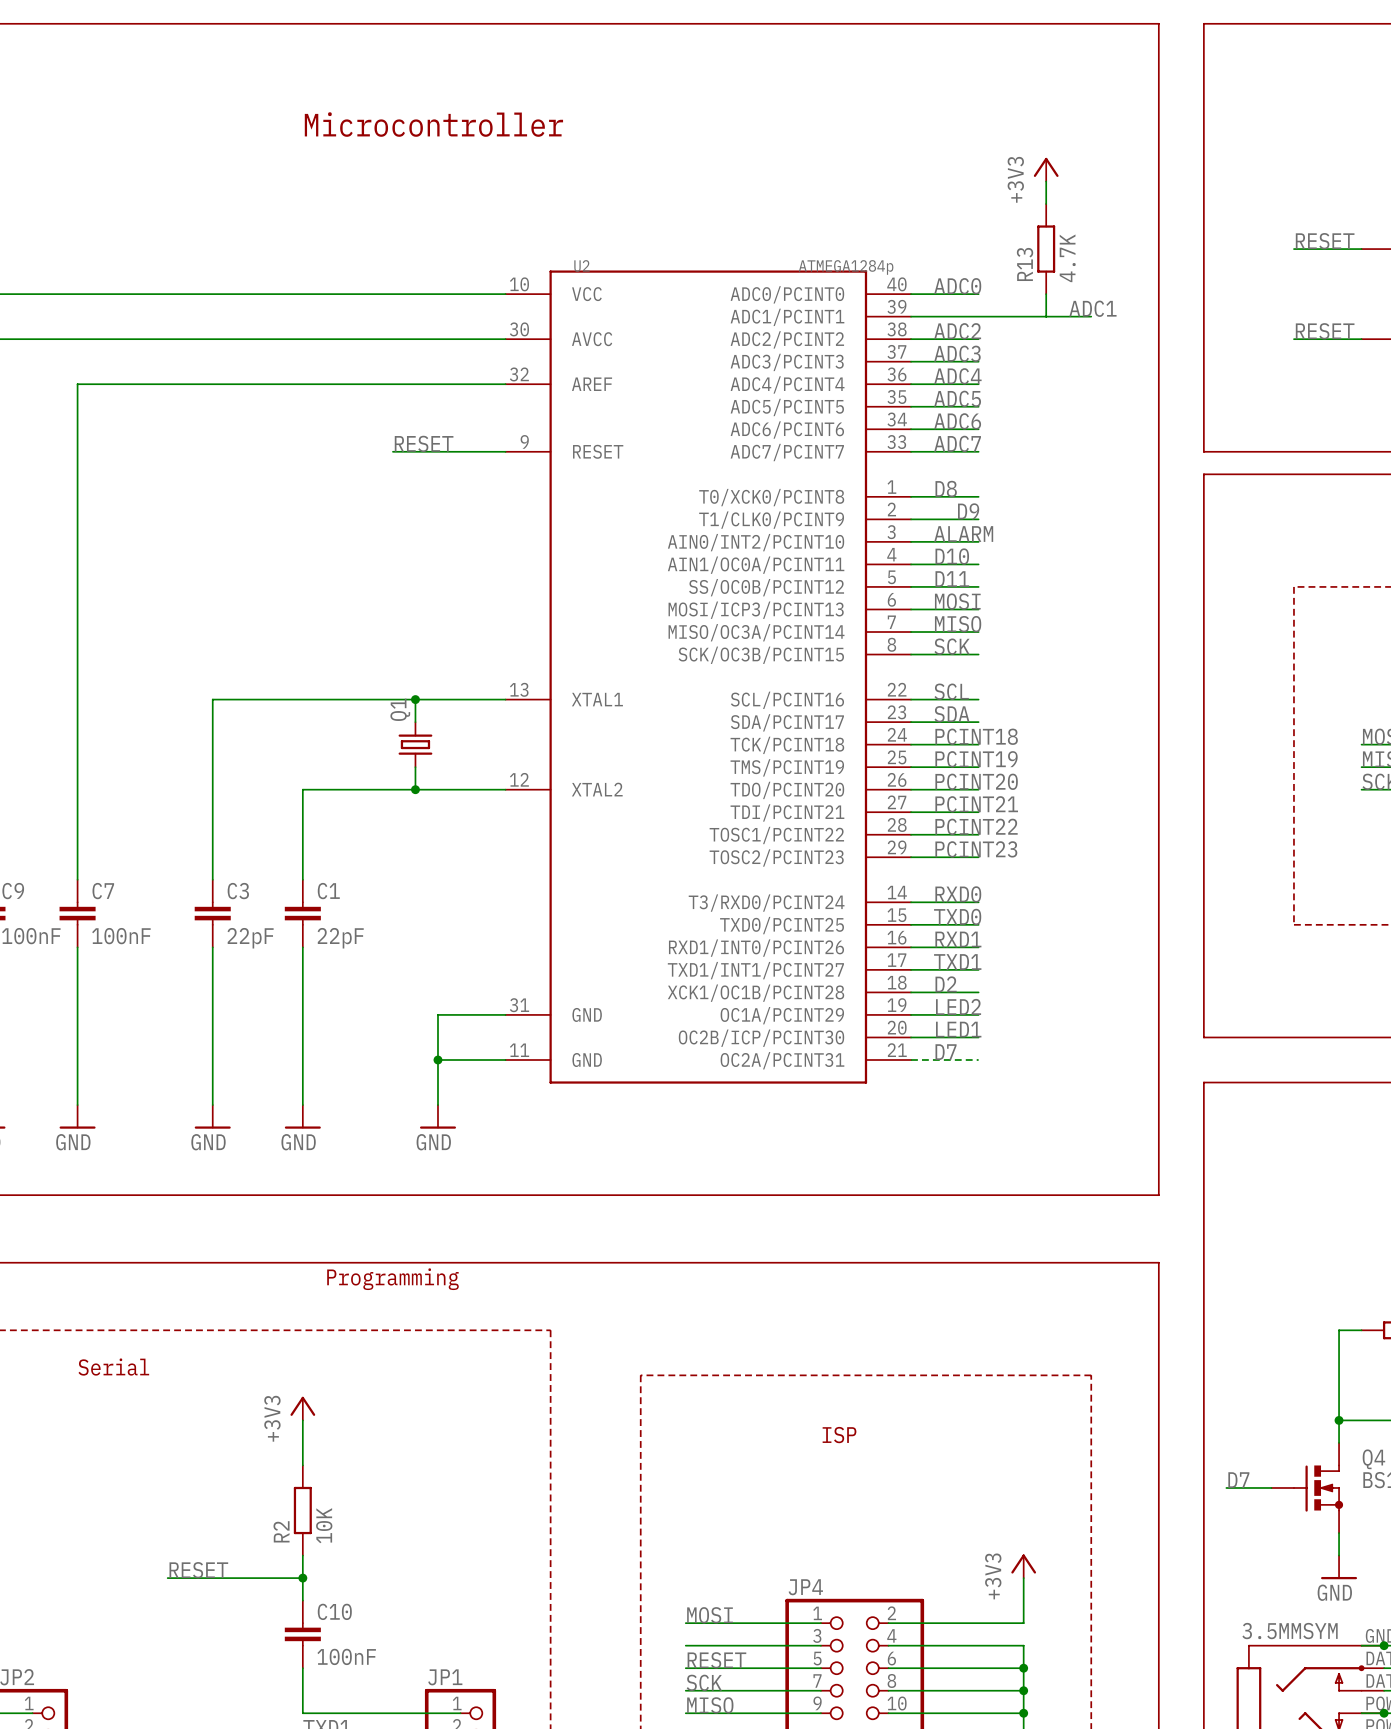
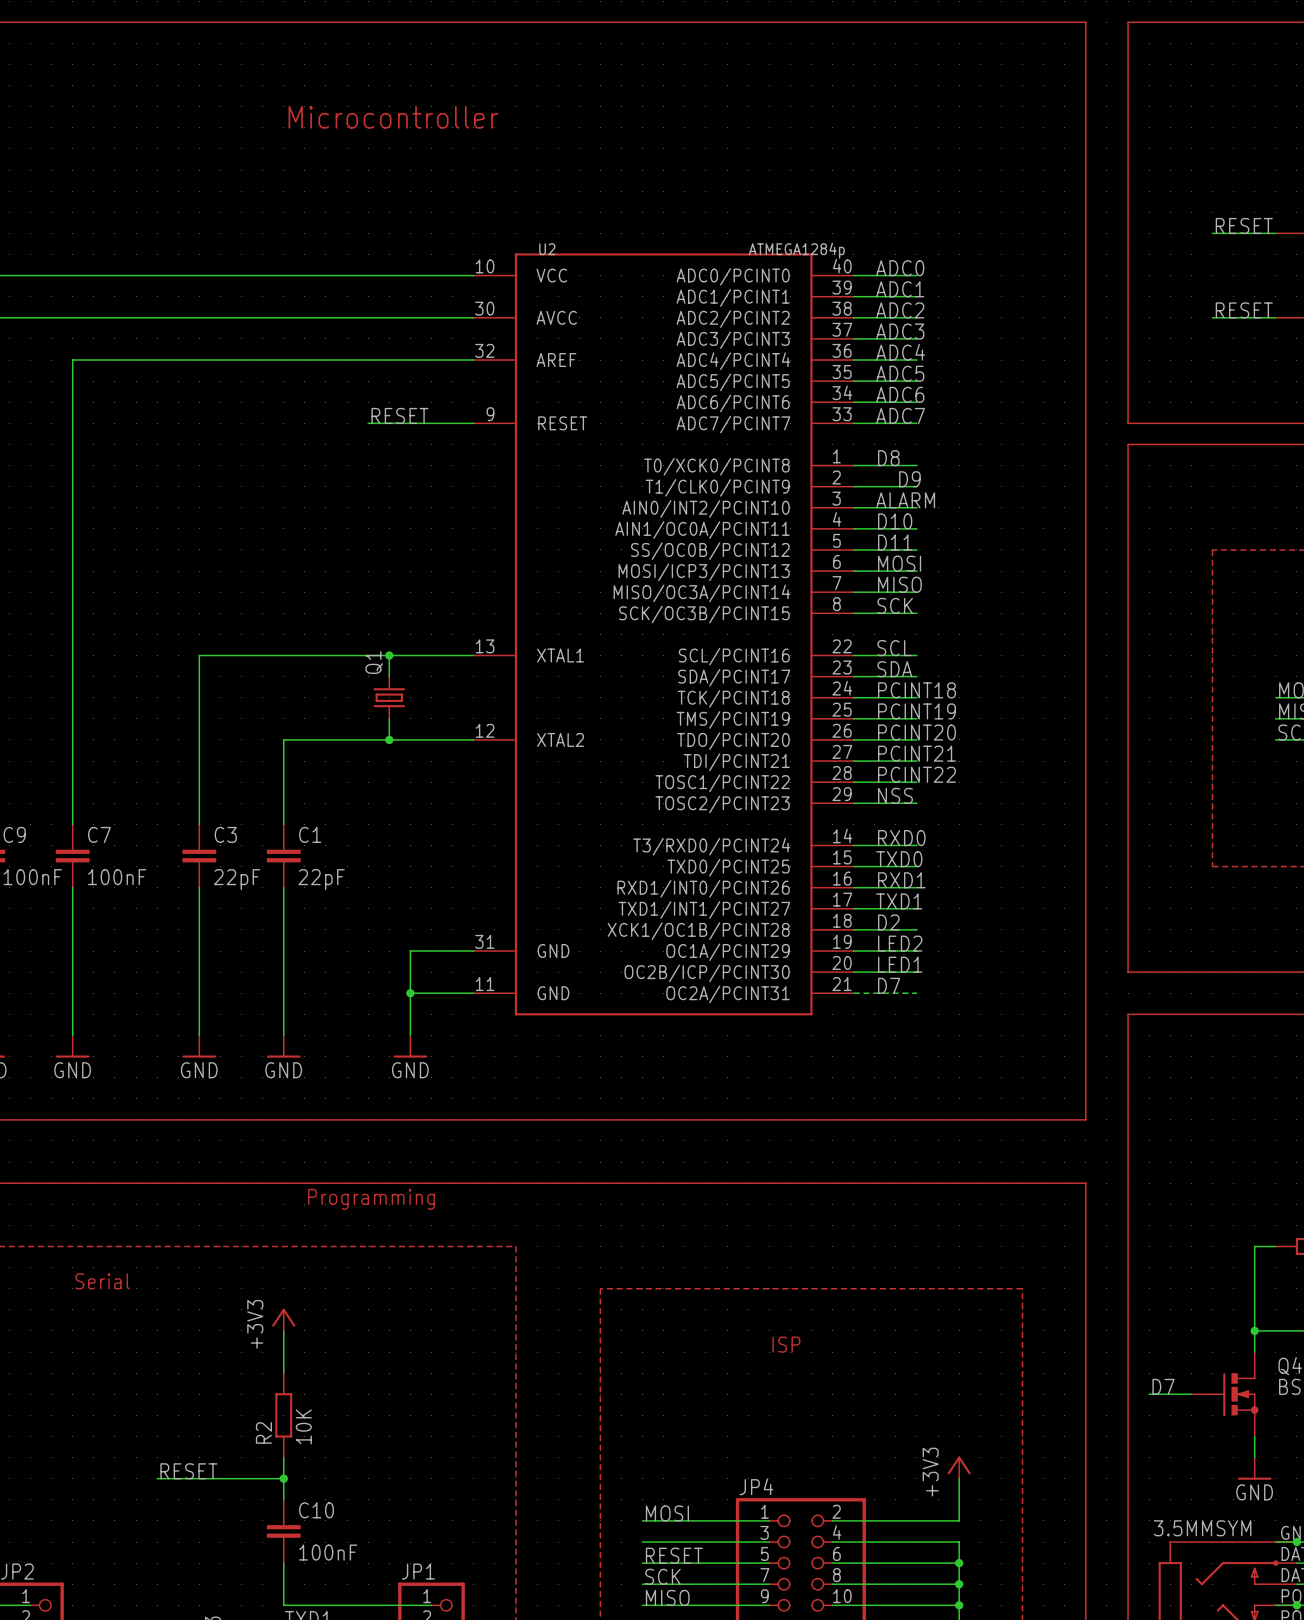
power symbol: +3V3 (1046, 169) -> none
wire: (1046, 181) (1046, 204) -> none
R13: 4.7K (1046, 249) -> none
wire: (1046, 294) (1046, 316) -> none
label position: ADC1 (1092, 308) -> ADC1 (900, 289)
wire: (978, 316) (1091, 316) -> none
label: PCINT23 (976, 849) -> NSS (895, 795)

